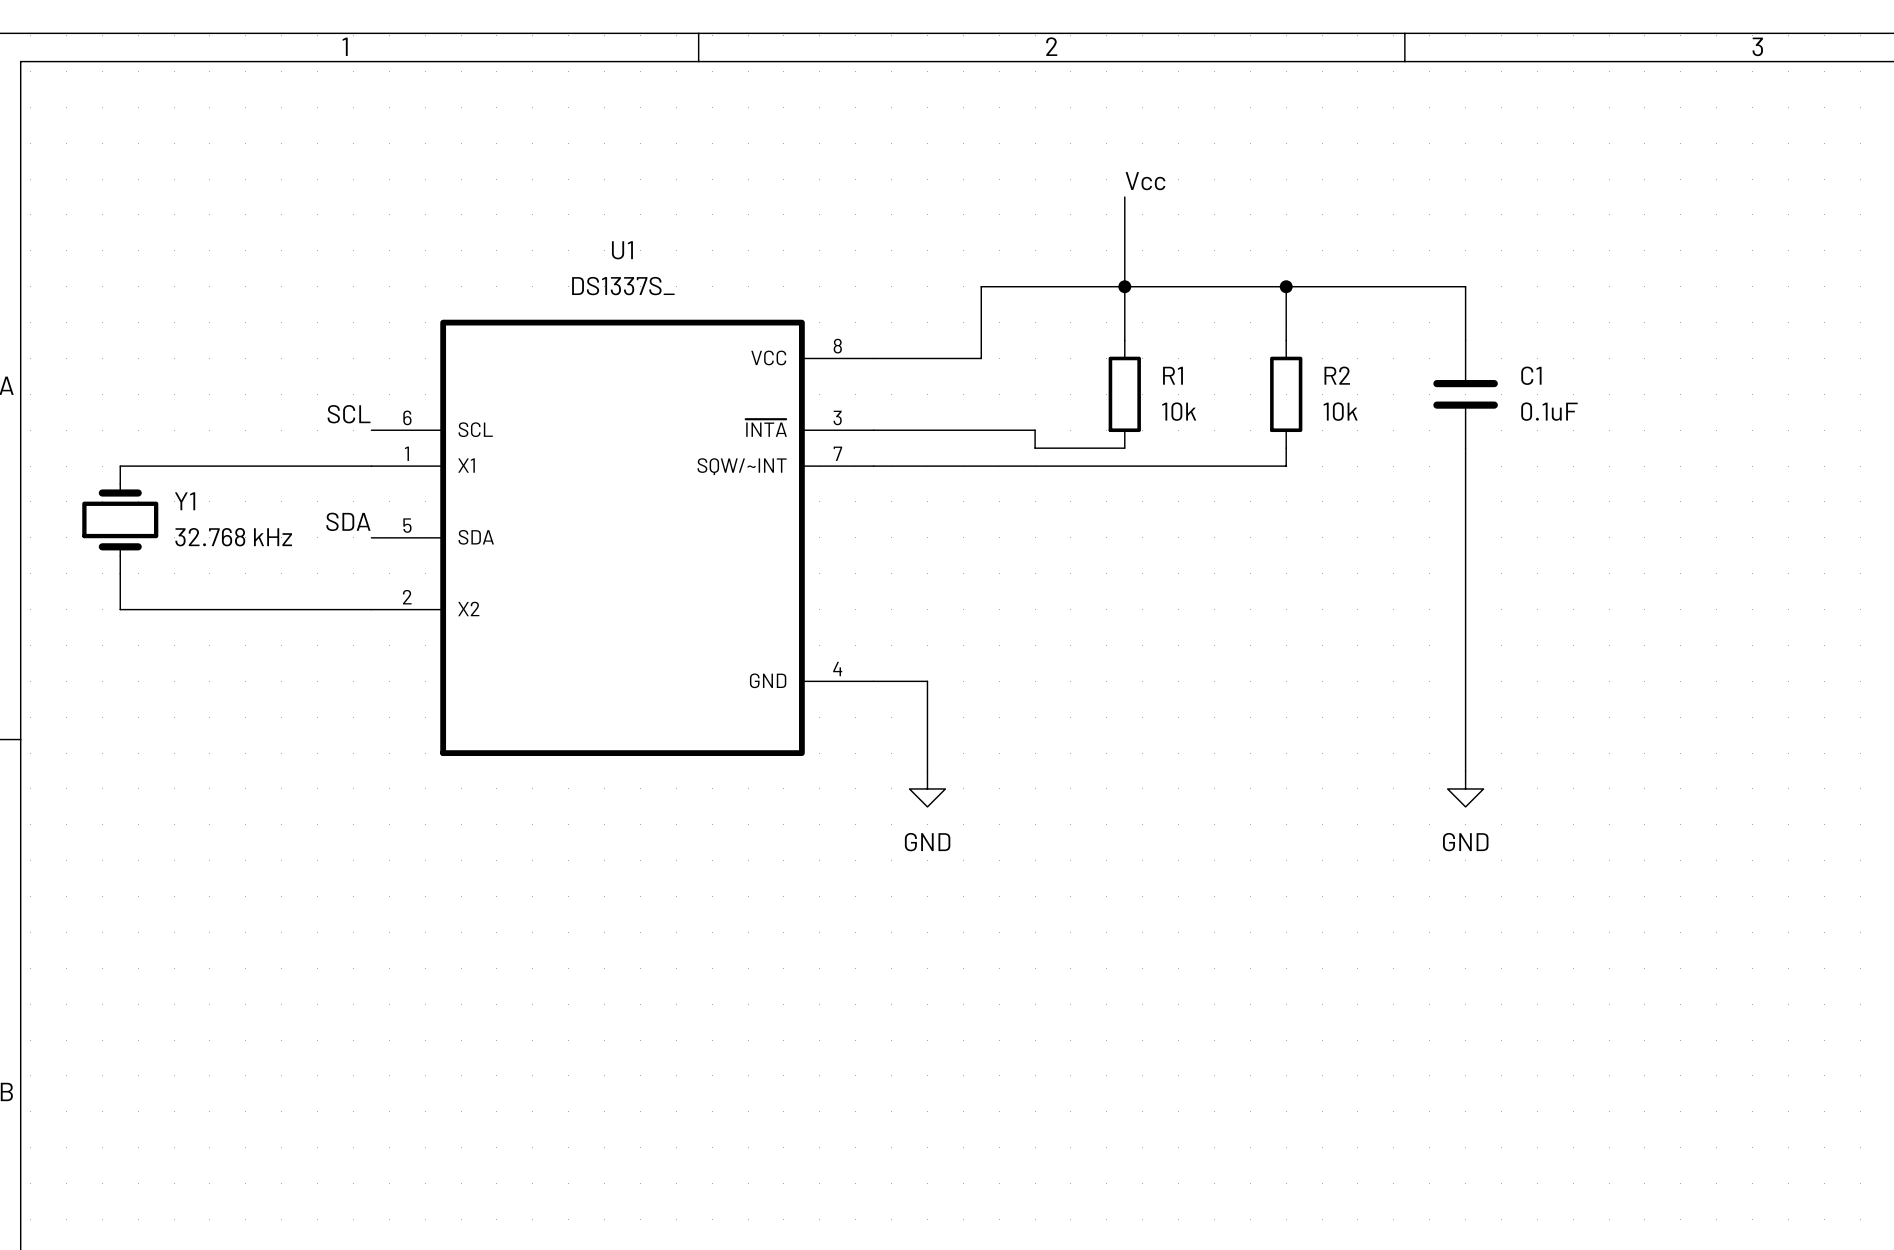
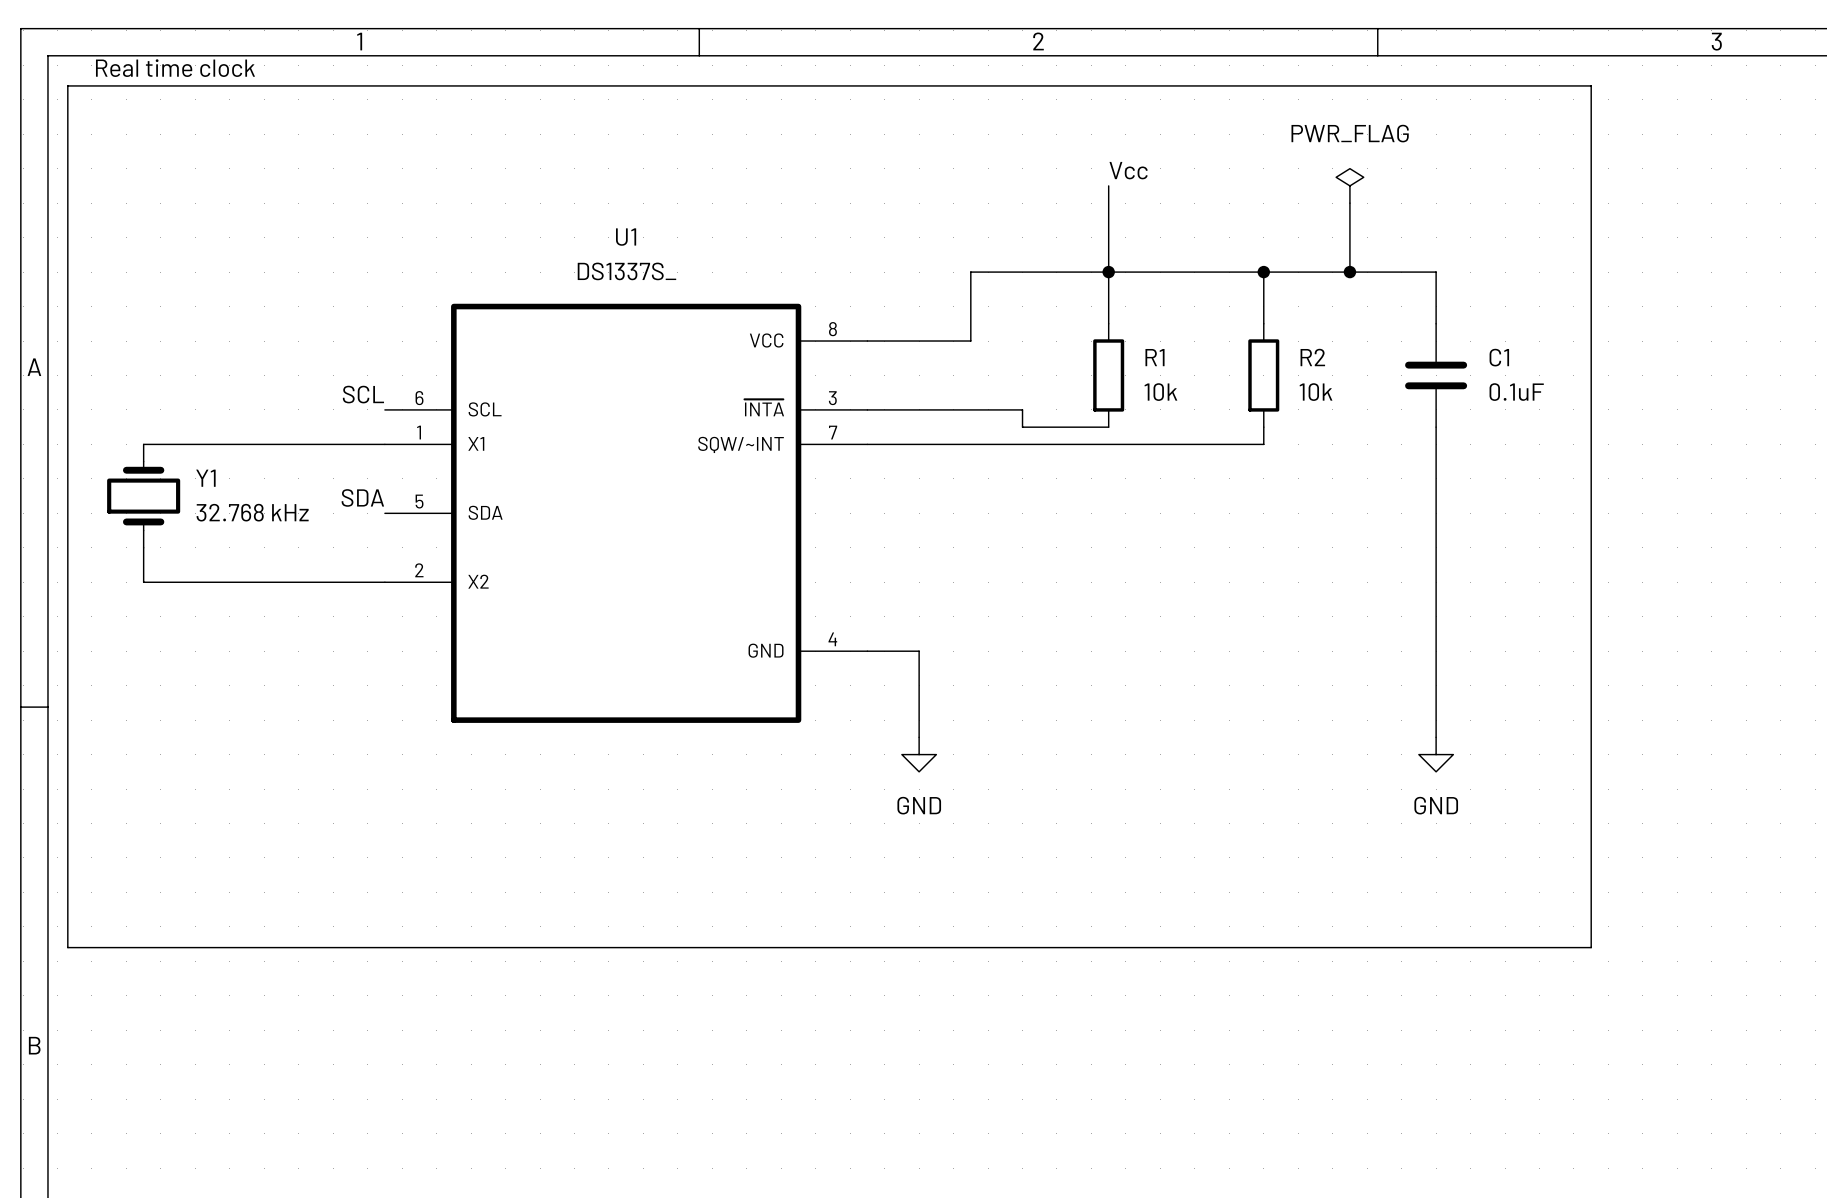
text: none -> Real time clock (175, 68)
line: none -> (67, 85) (1591, 85) (1591, 947) (67, 947) (67, 85)
power symbol: none -> PWR_FLAG (1349, 185)
wire: none -> (1349, 203) (1349, 272)
junction: none -> (1349, 272)

